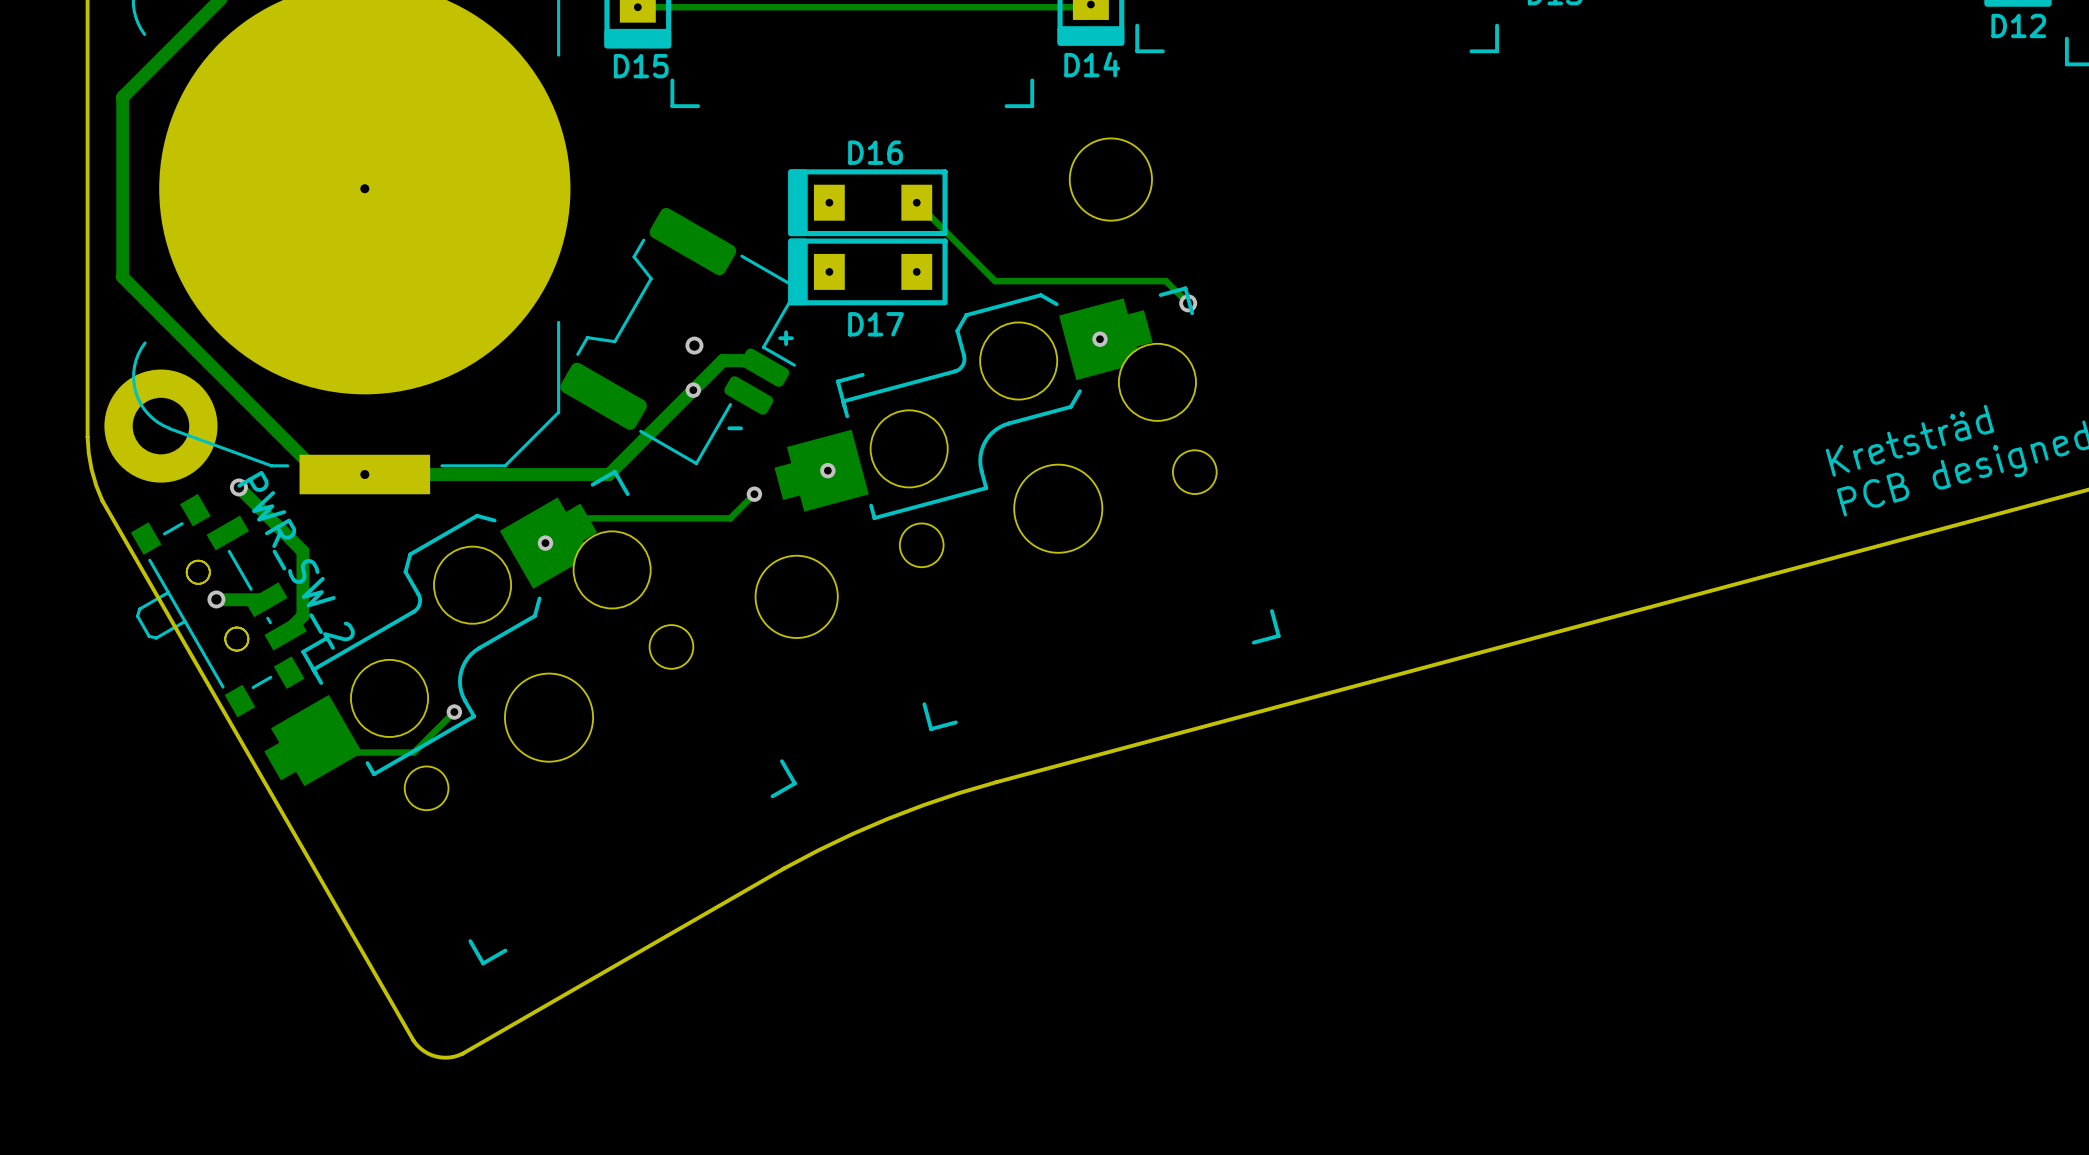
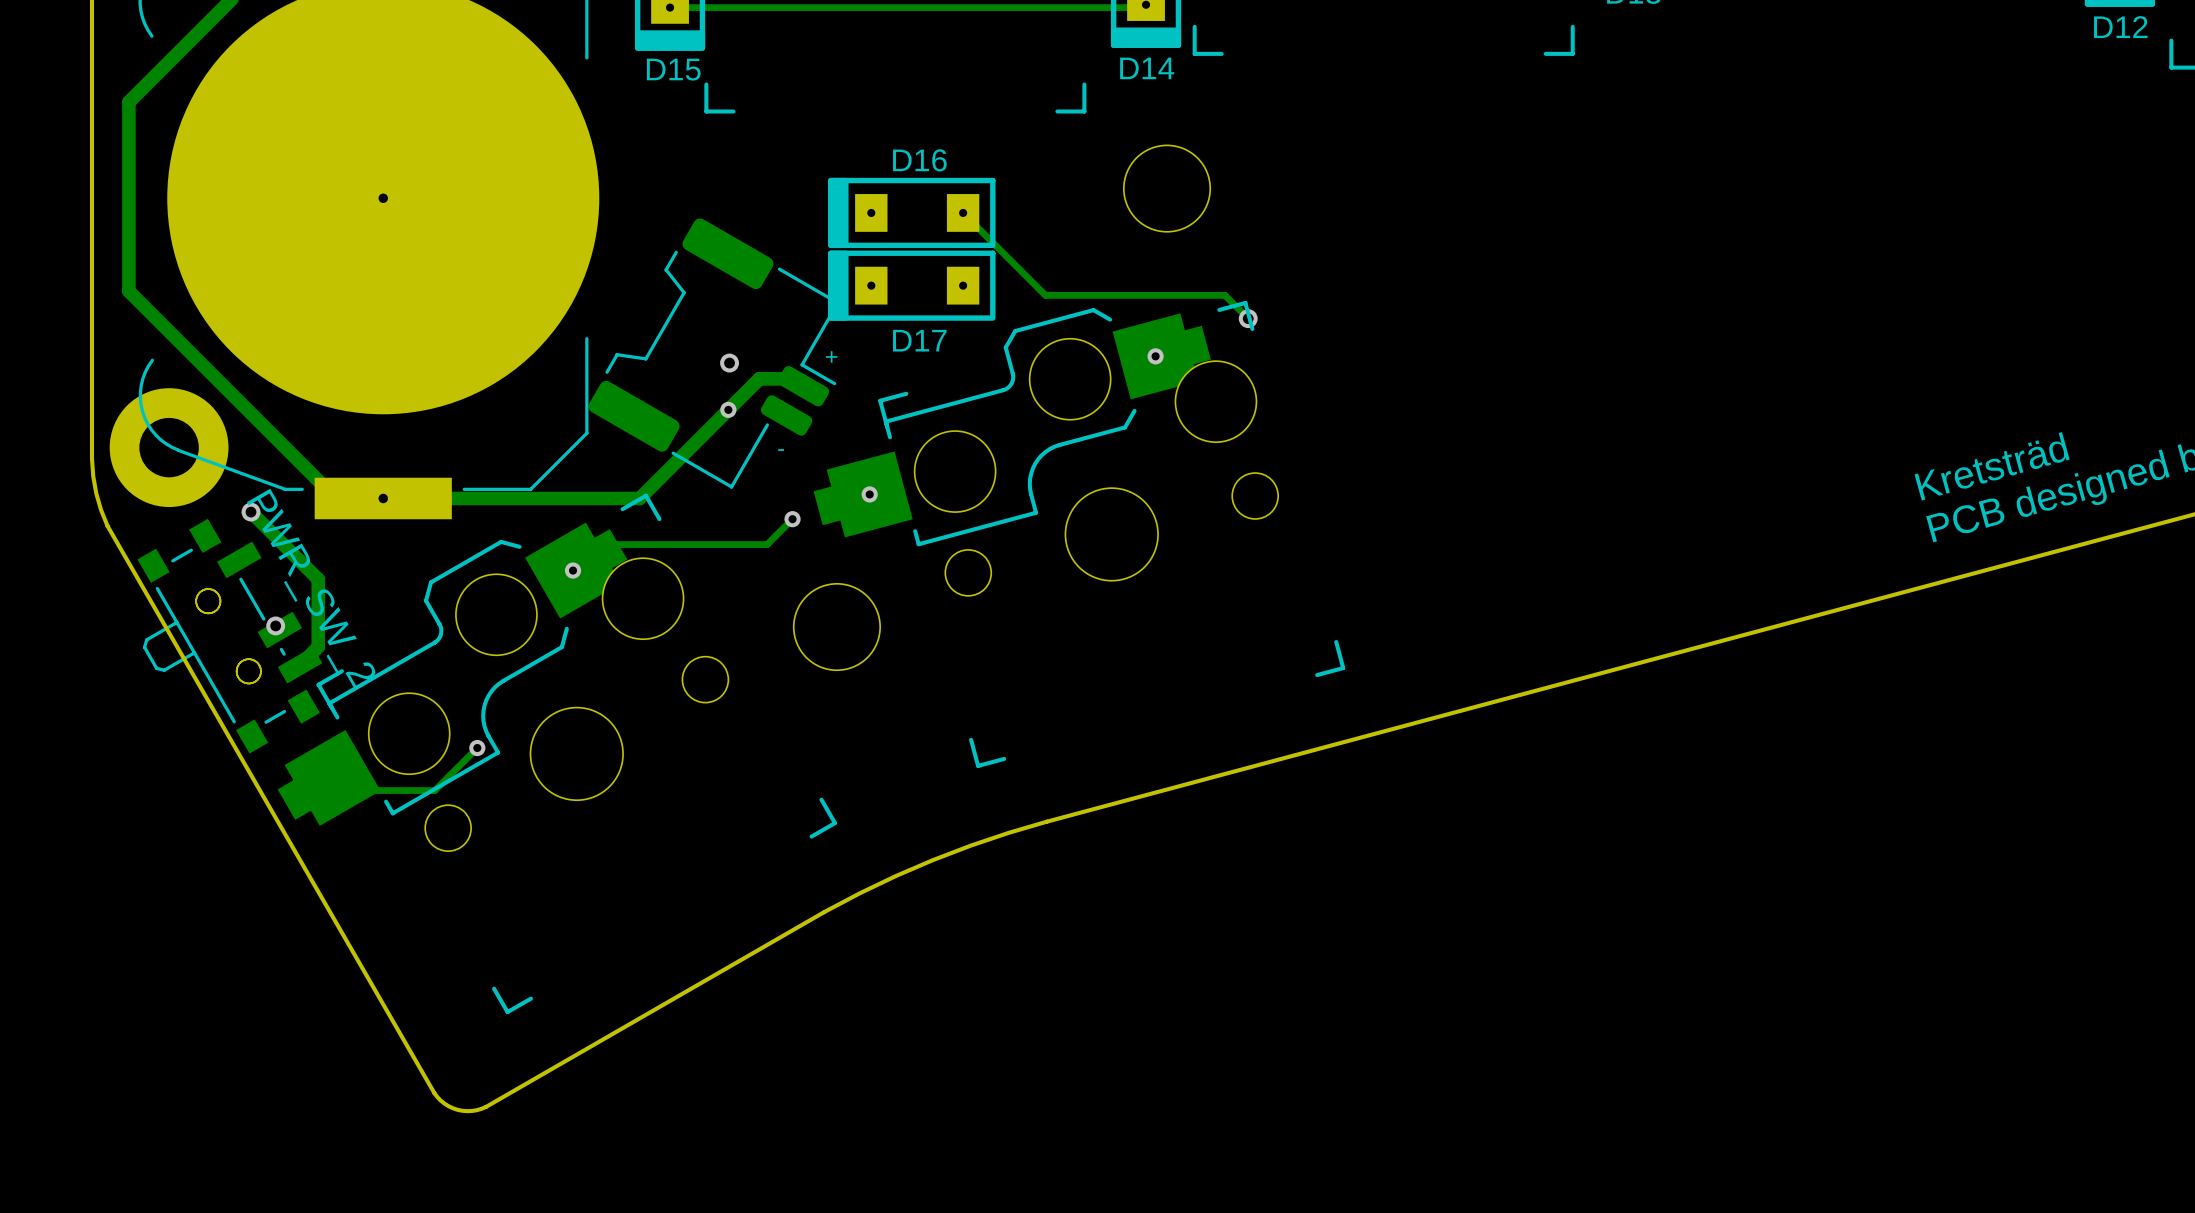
via position: (216, 599) -> (275, 625)
track: (266, 599) (216, 599) -> none

